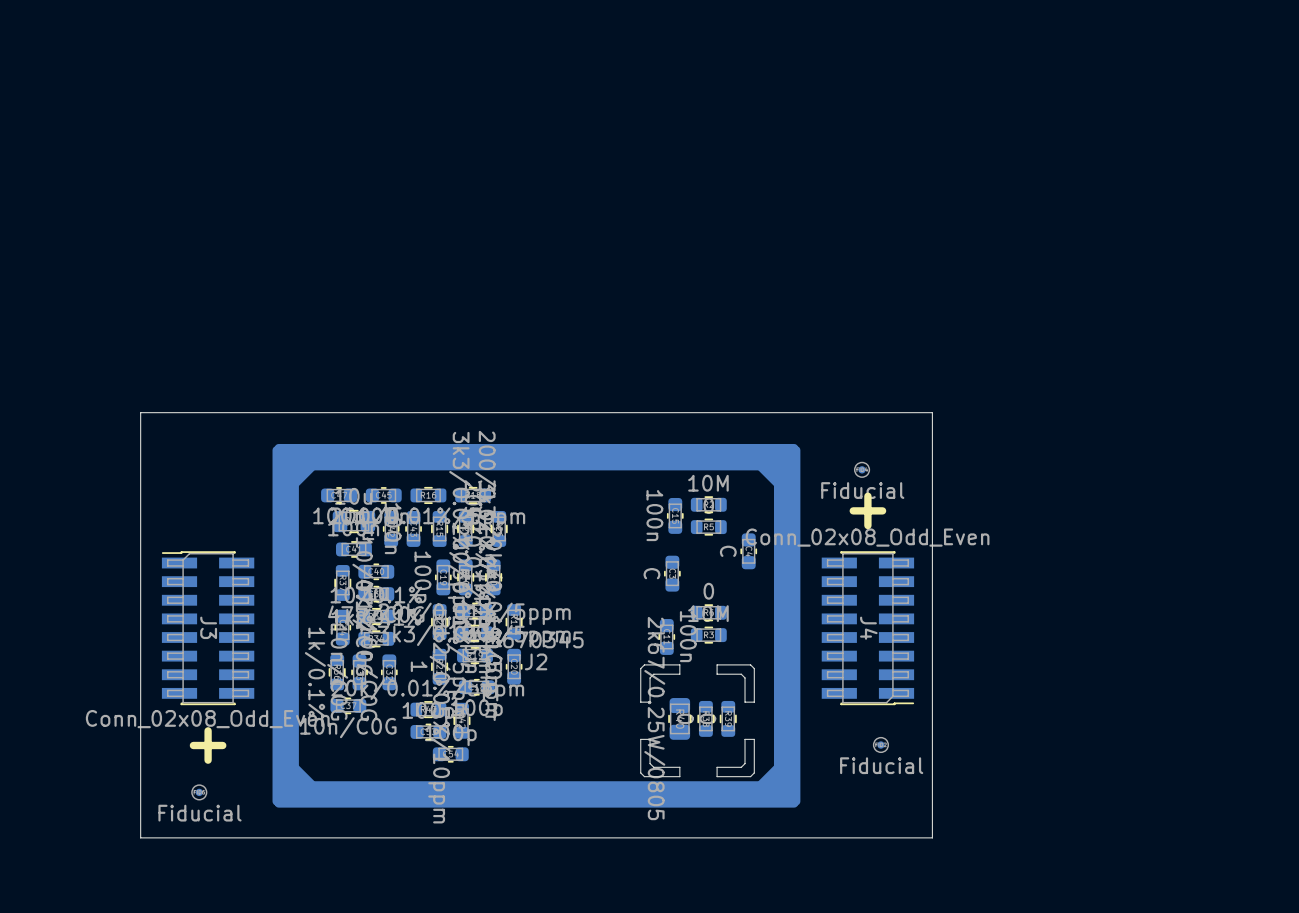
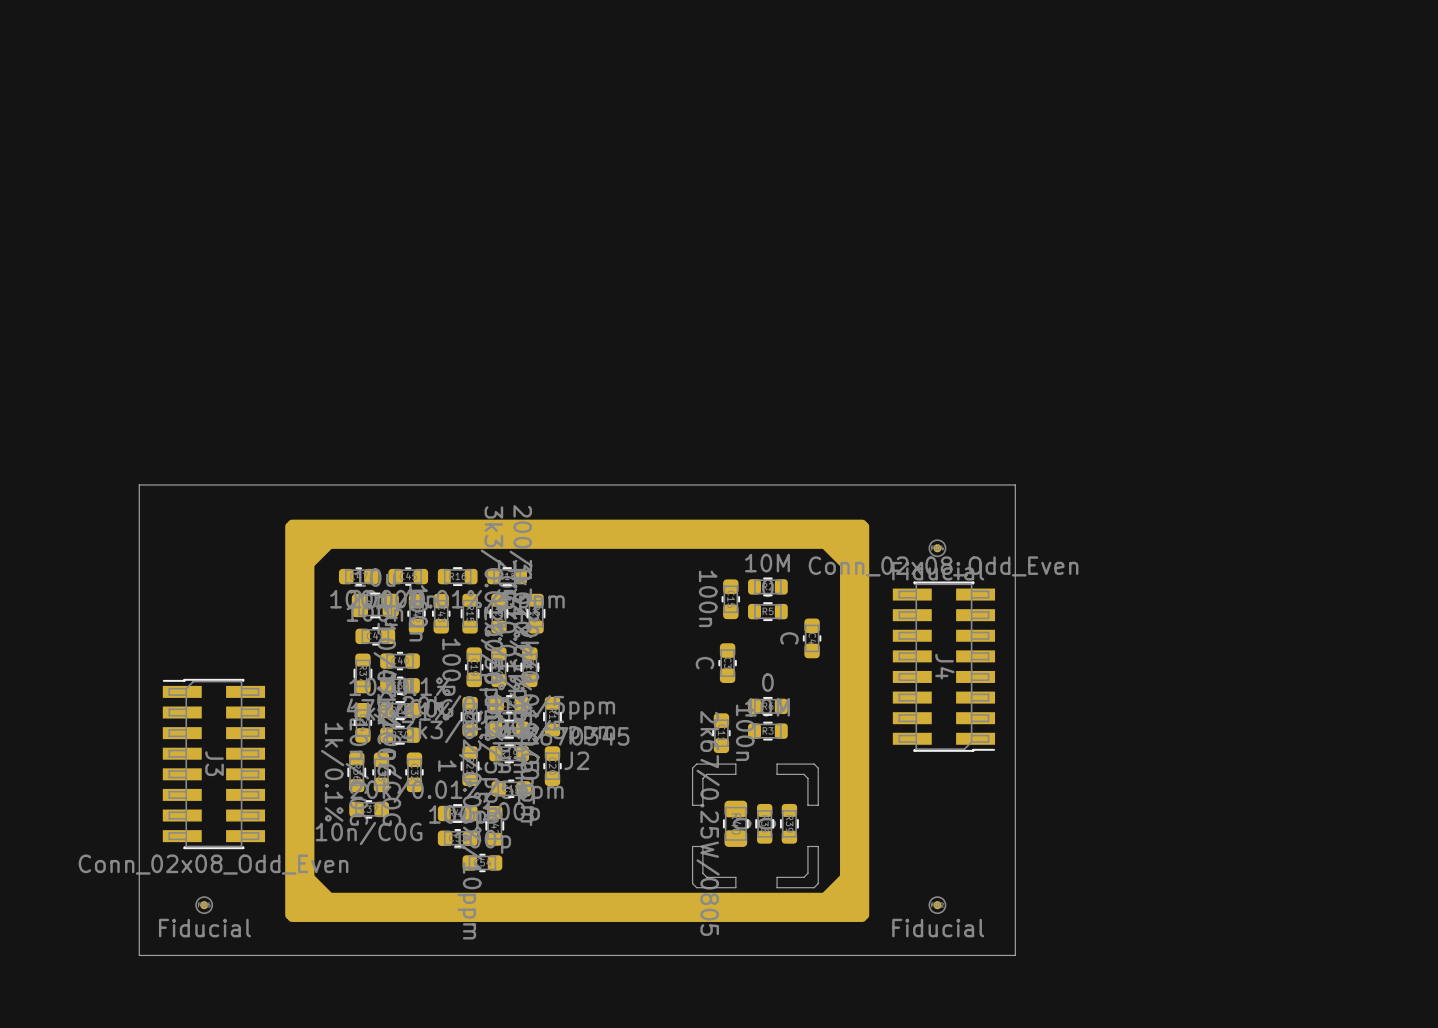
line: (867, 496) (867, 525) -> none
line: (882, 510) (853, 510) -> none
J3 position: (208, 628) -> (213, 764)
J4 position: (867, 628) -> (943, 666)
line: (208, 730) (208, 760) -> none
part position: (880, 744) -> (937, 905)
line: (222, 745) (193, 745) -> none

